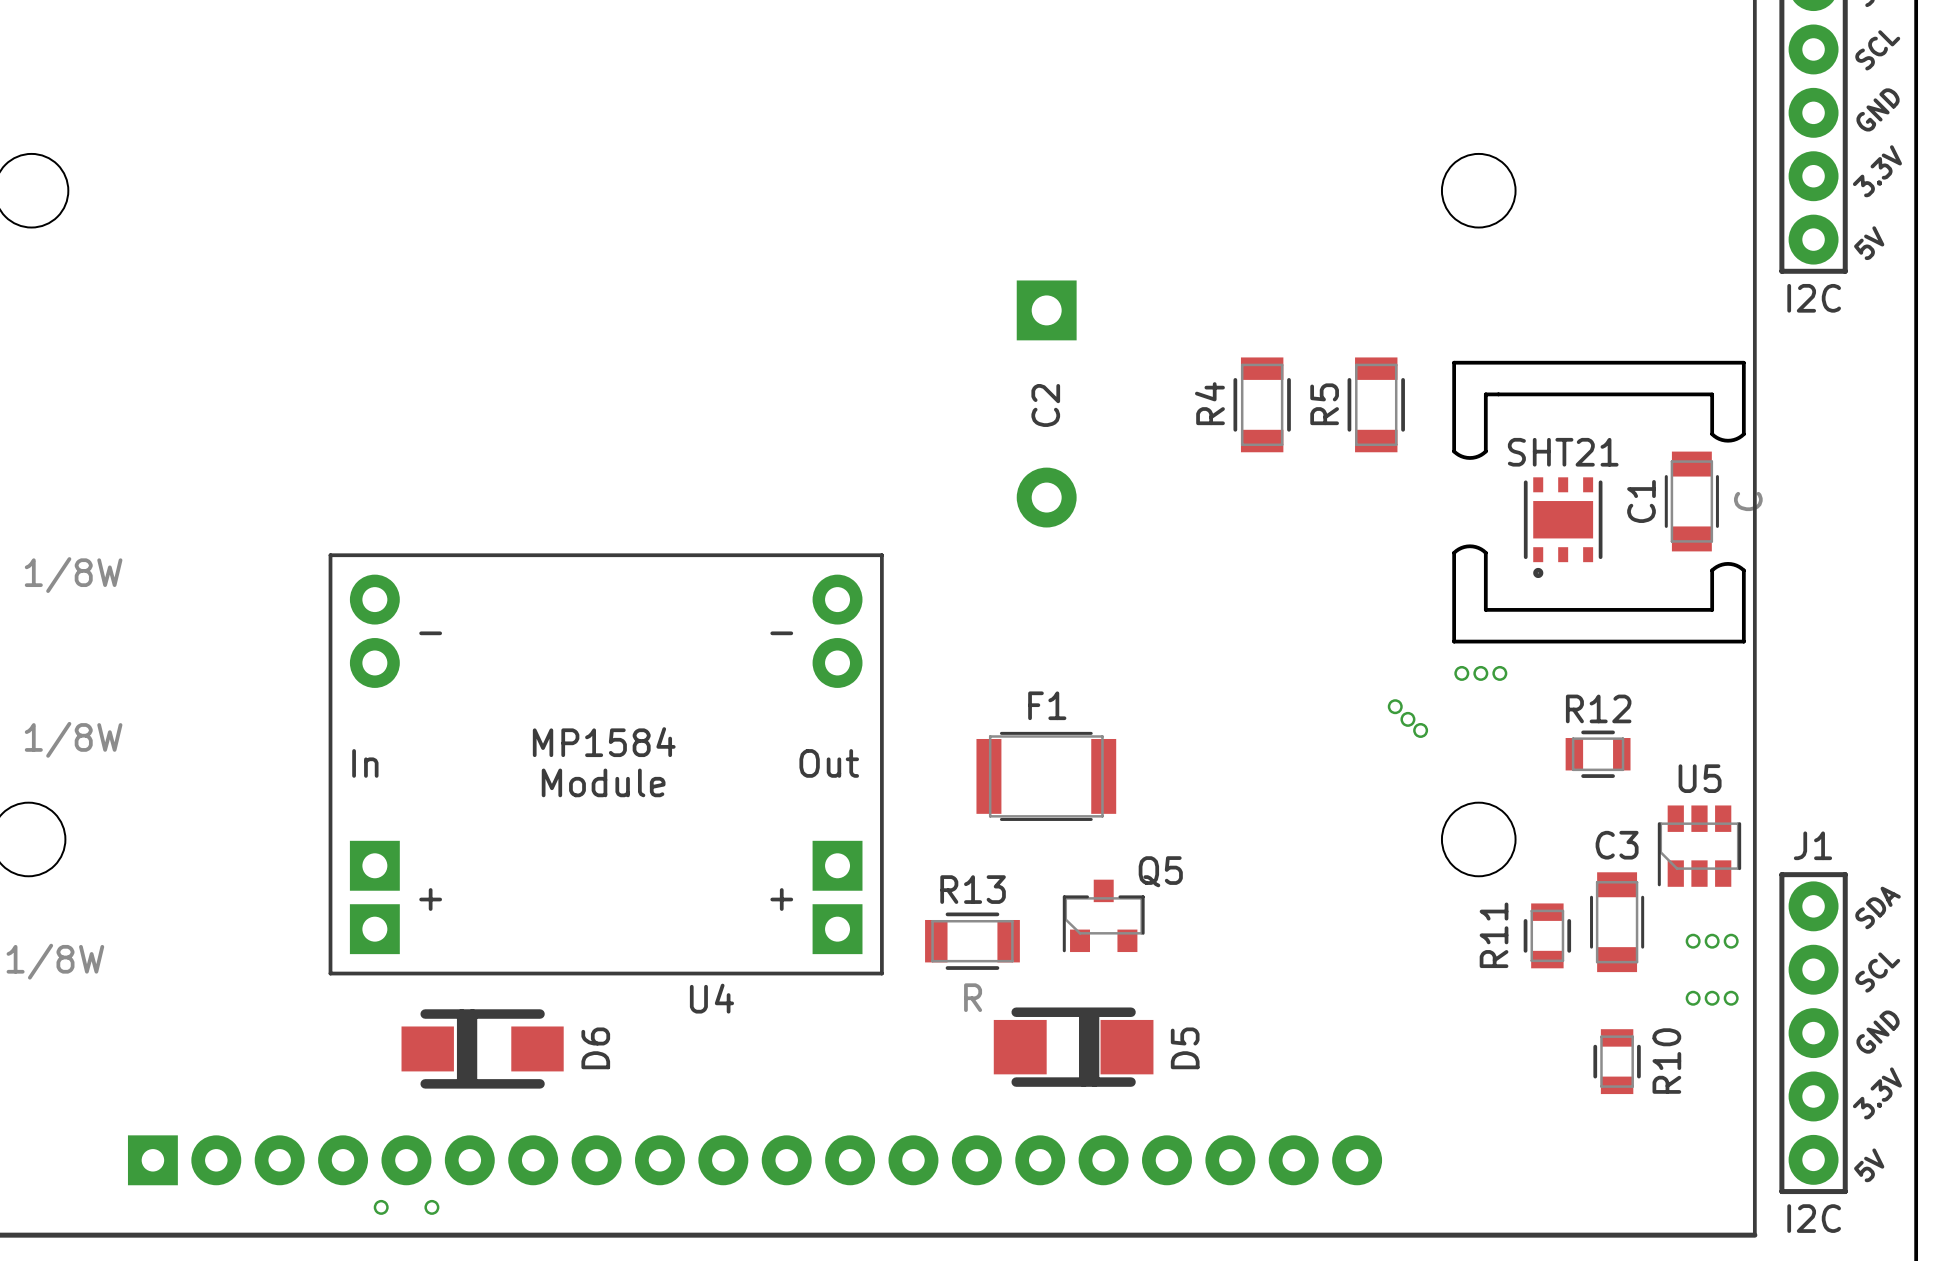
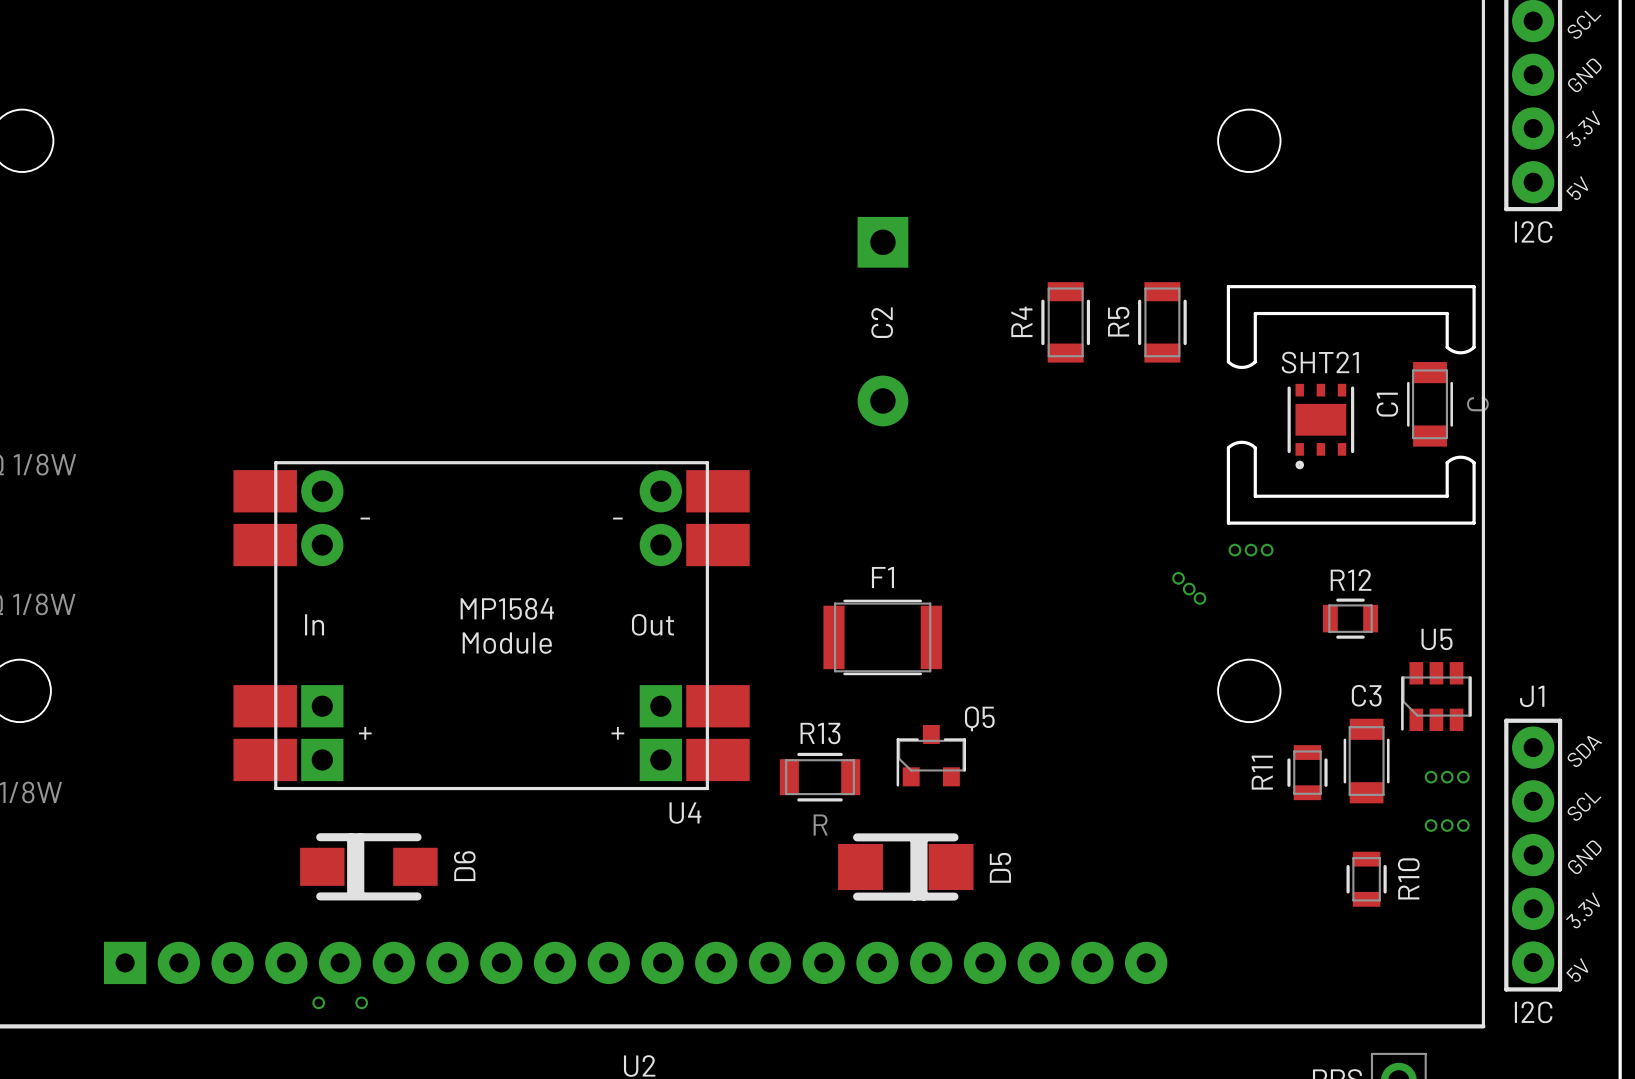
U4 footprint: [328, 553, 884, 976] -> [233, 461, 750, 791]
U4 name position: U4 (711, 998) -> U4 (685, 813)
D6 position: (482, 1048) -> (368, 866)

